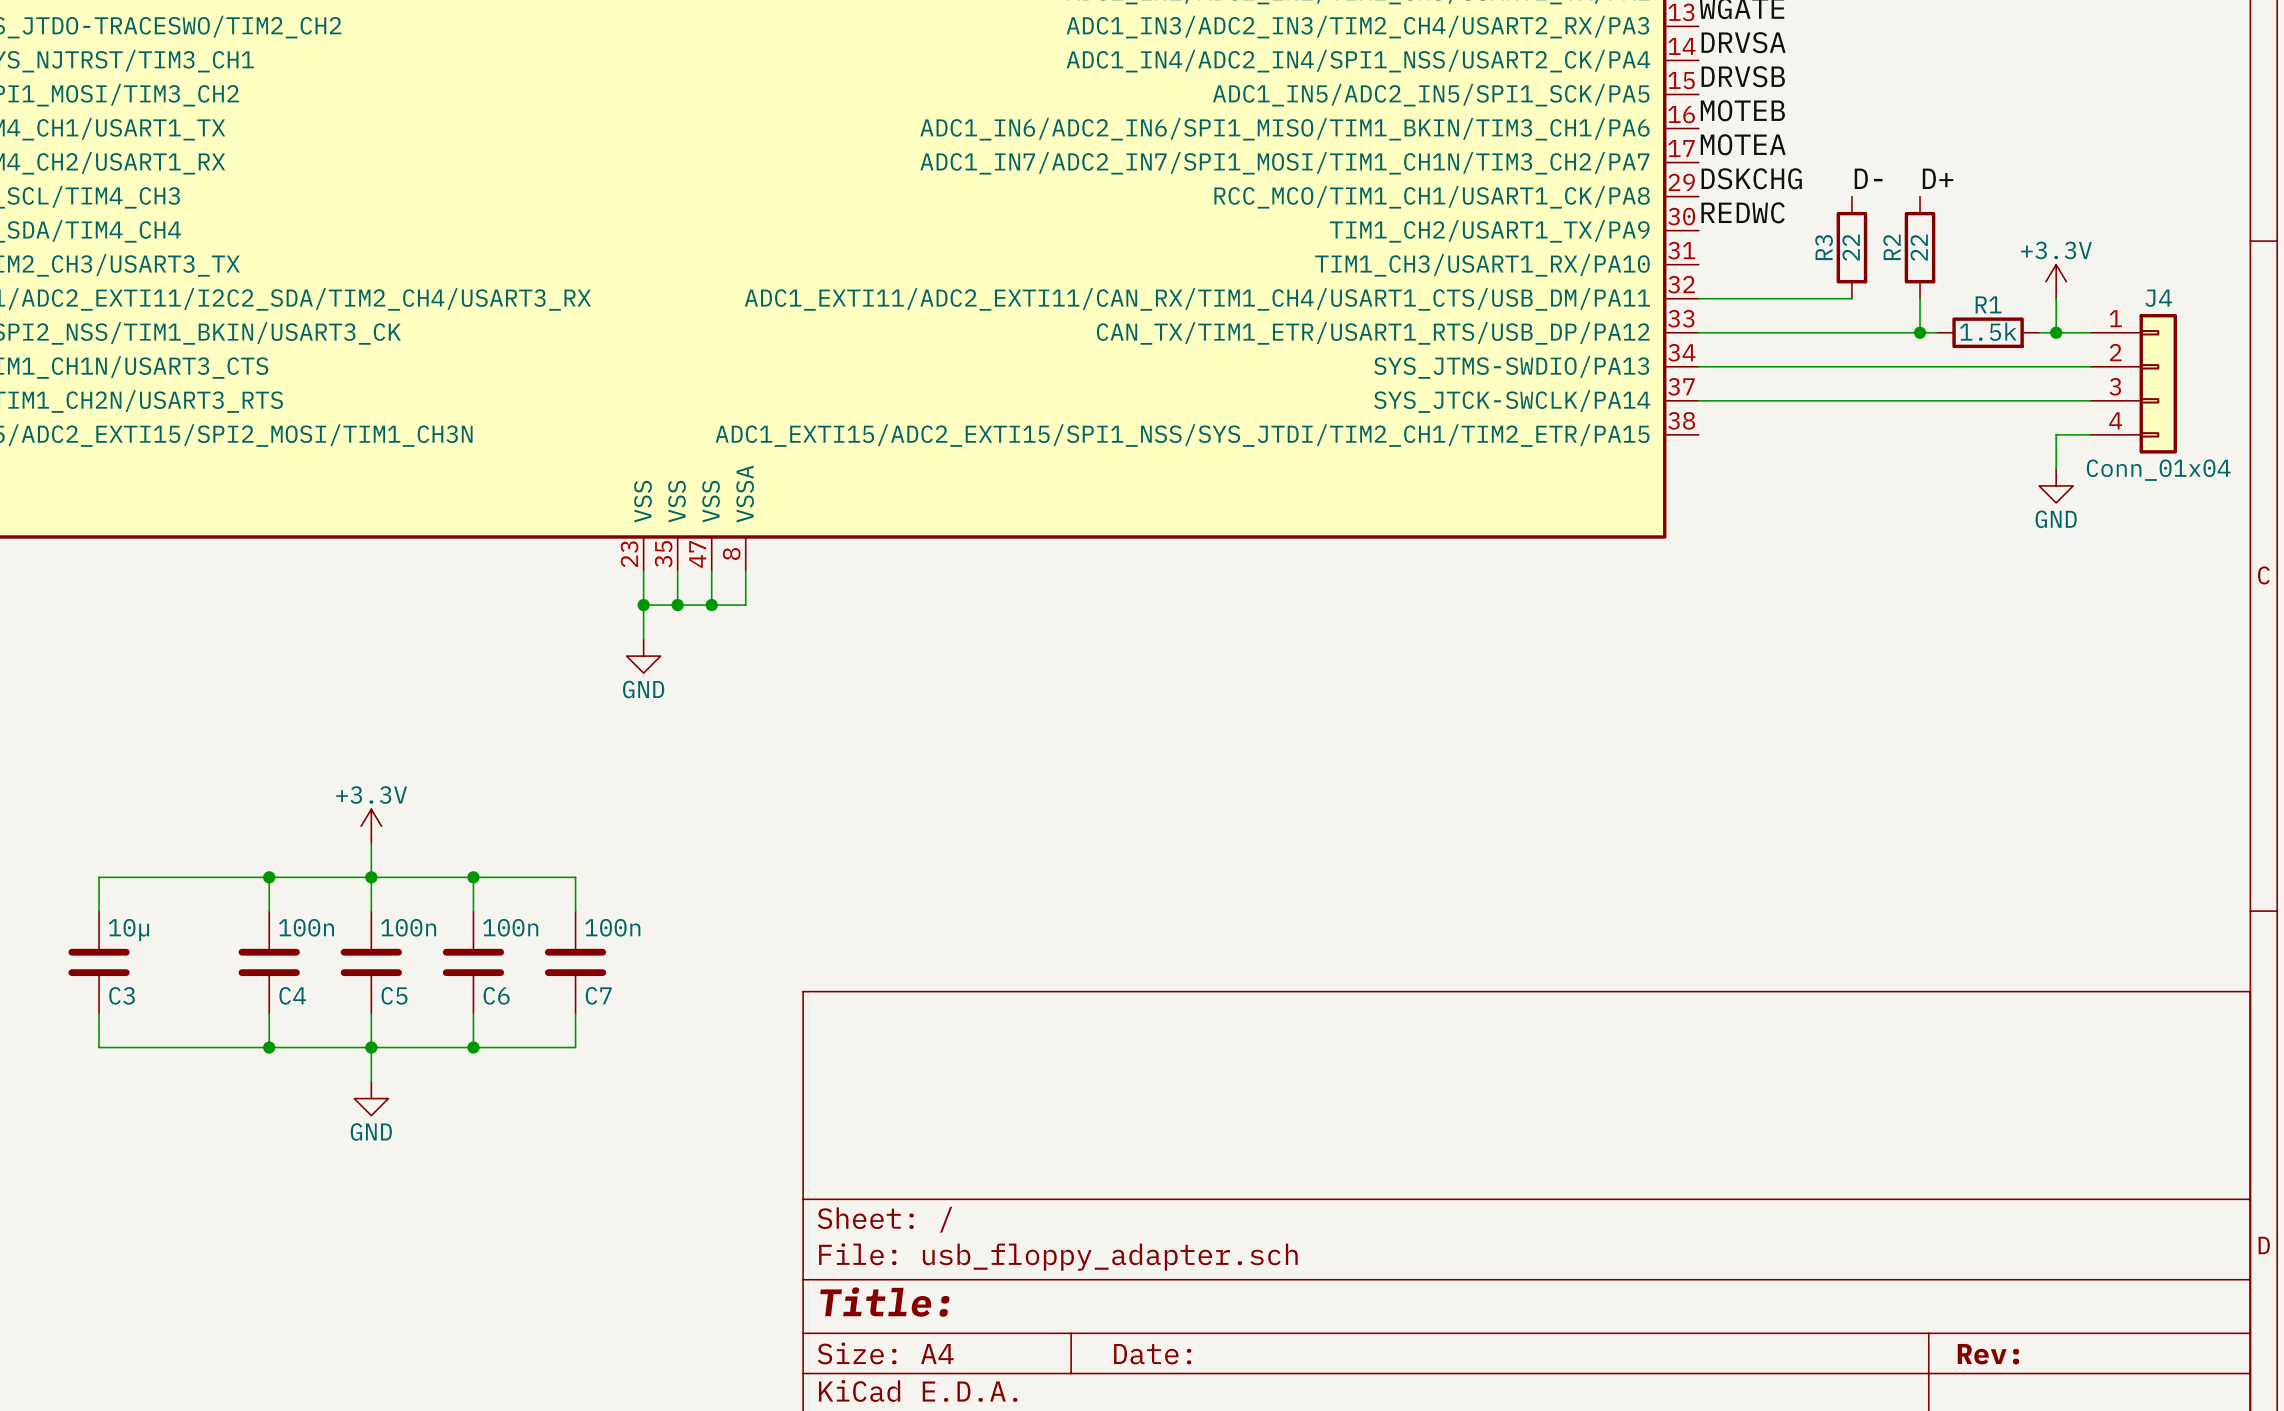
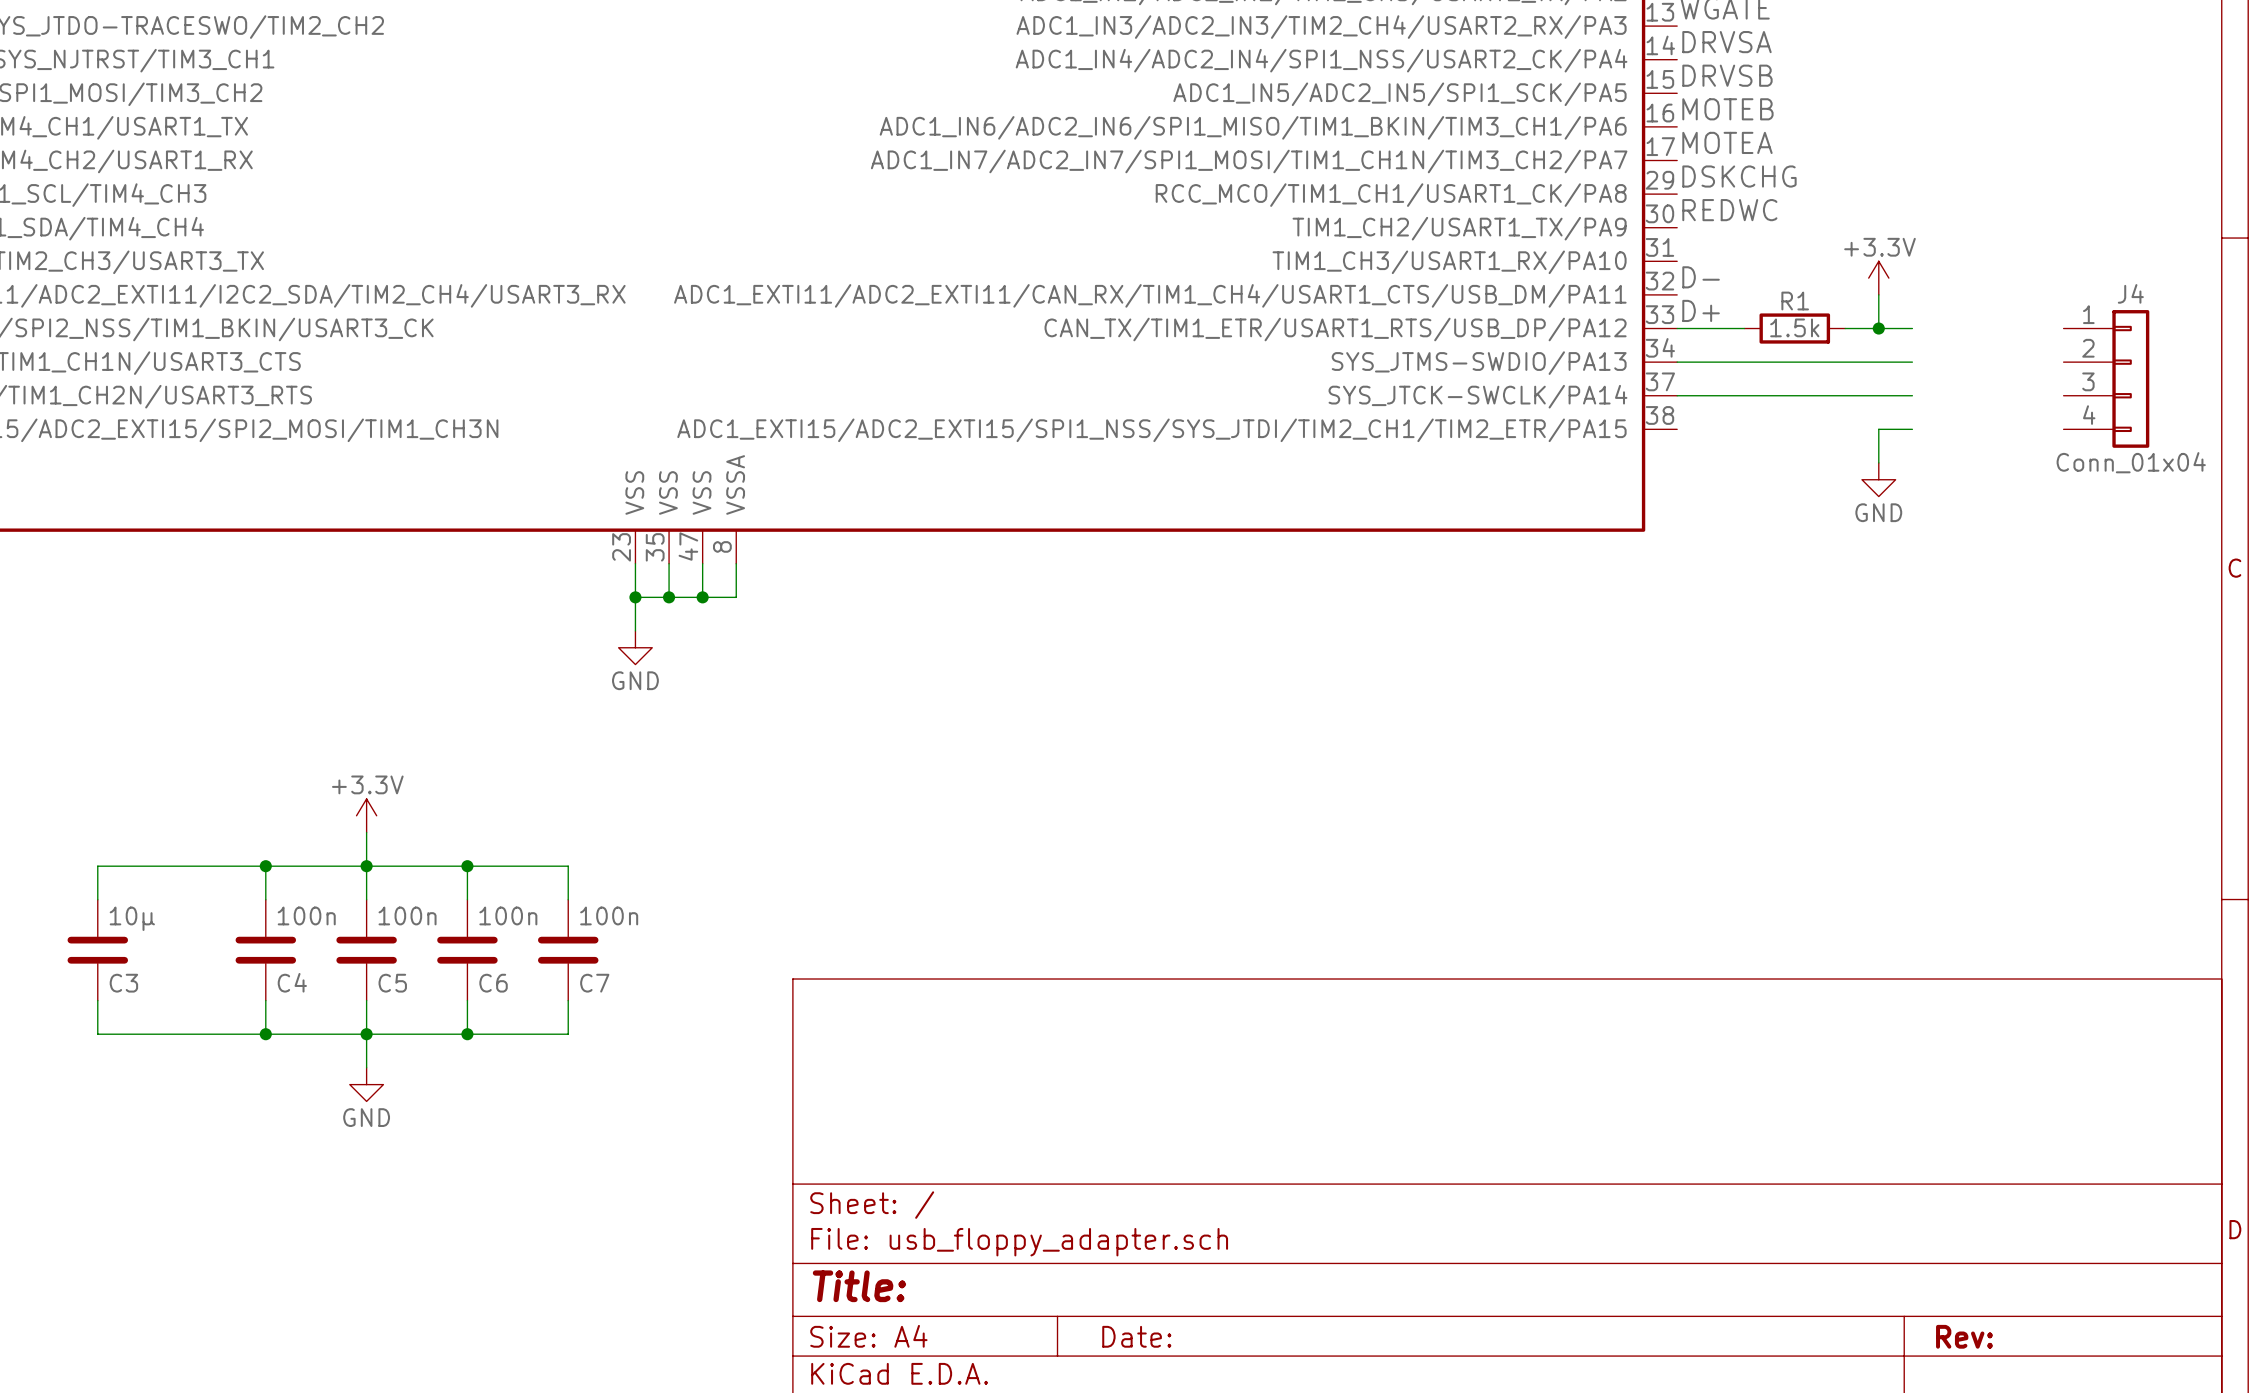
label position: D- (1868, 178) -> D- (1701, 277)
label position: D+ (1938, 178) -> D+ (1701, 310)
R3: 22 (1851, 247) -> none
R2: 22 (1920, 247) -> none
power symbol position: +3.3V (2056, 281) -> +3.3V (1878, 278)
wire: (1698, 298) (1851, 298) -> none
wire: (1920, 298) (1920, 332) -> none
wire: (2056, 298) (2056, 332) -> (1878, 294) (1878, 328)
wire: (1766, 332) (1868, 332) -> none
junction position: (1920, 332) -> (1878, 328)
R1 position: (1988, 332) -> (1794, 328)
wire: (2039, 332) (2090, 332) -> none
junction: (2056, 332) -> none
wire: (1937, 366) (2090, 366) -> none
wire: (1937, 400) (2090, 400) -> none
wire: (2090, 434) (2056, 434) (2056, 468) -> (1912, 429) (1878, 429) (1878, 462)
power symbol position: GND (2056, 485) -> GND (1878, 479)

